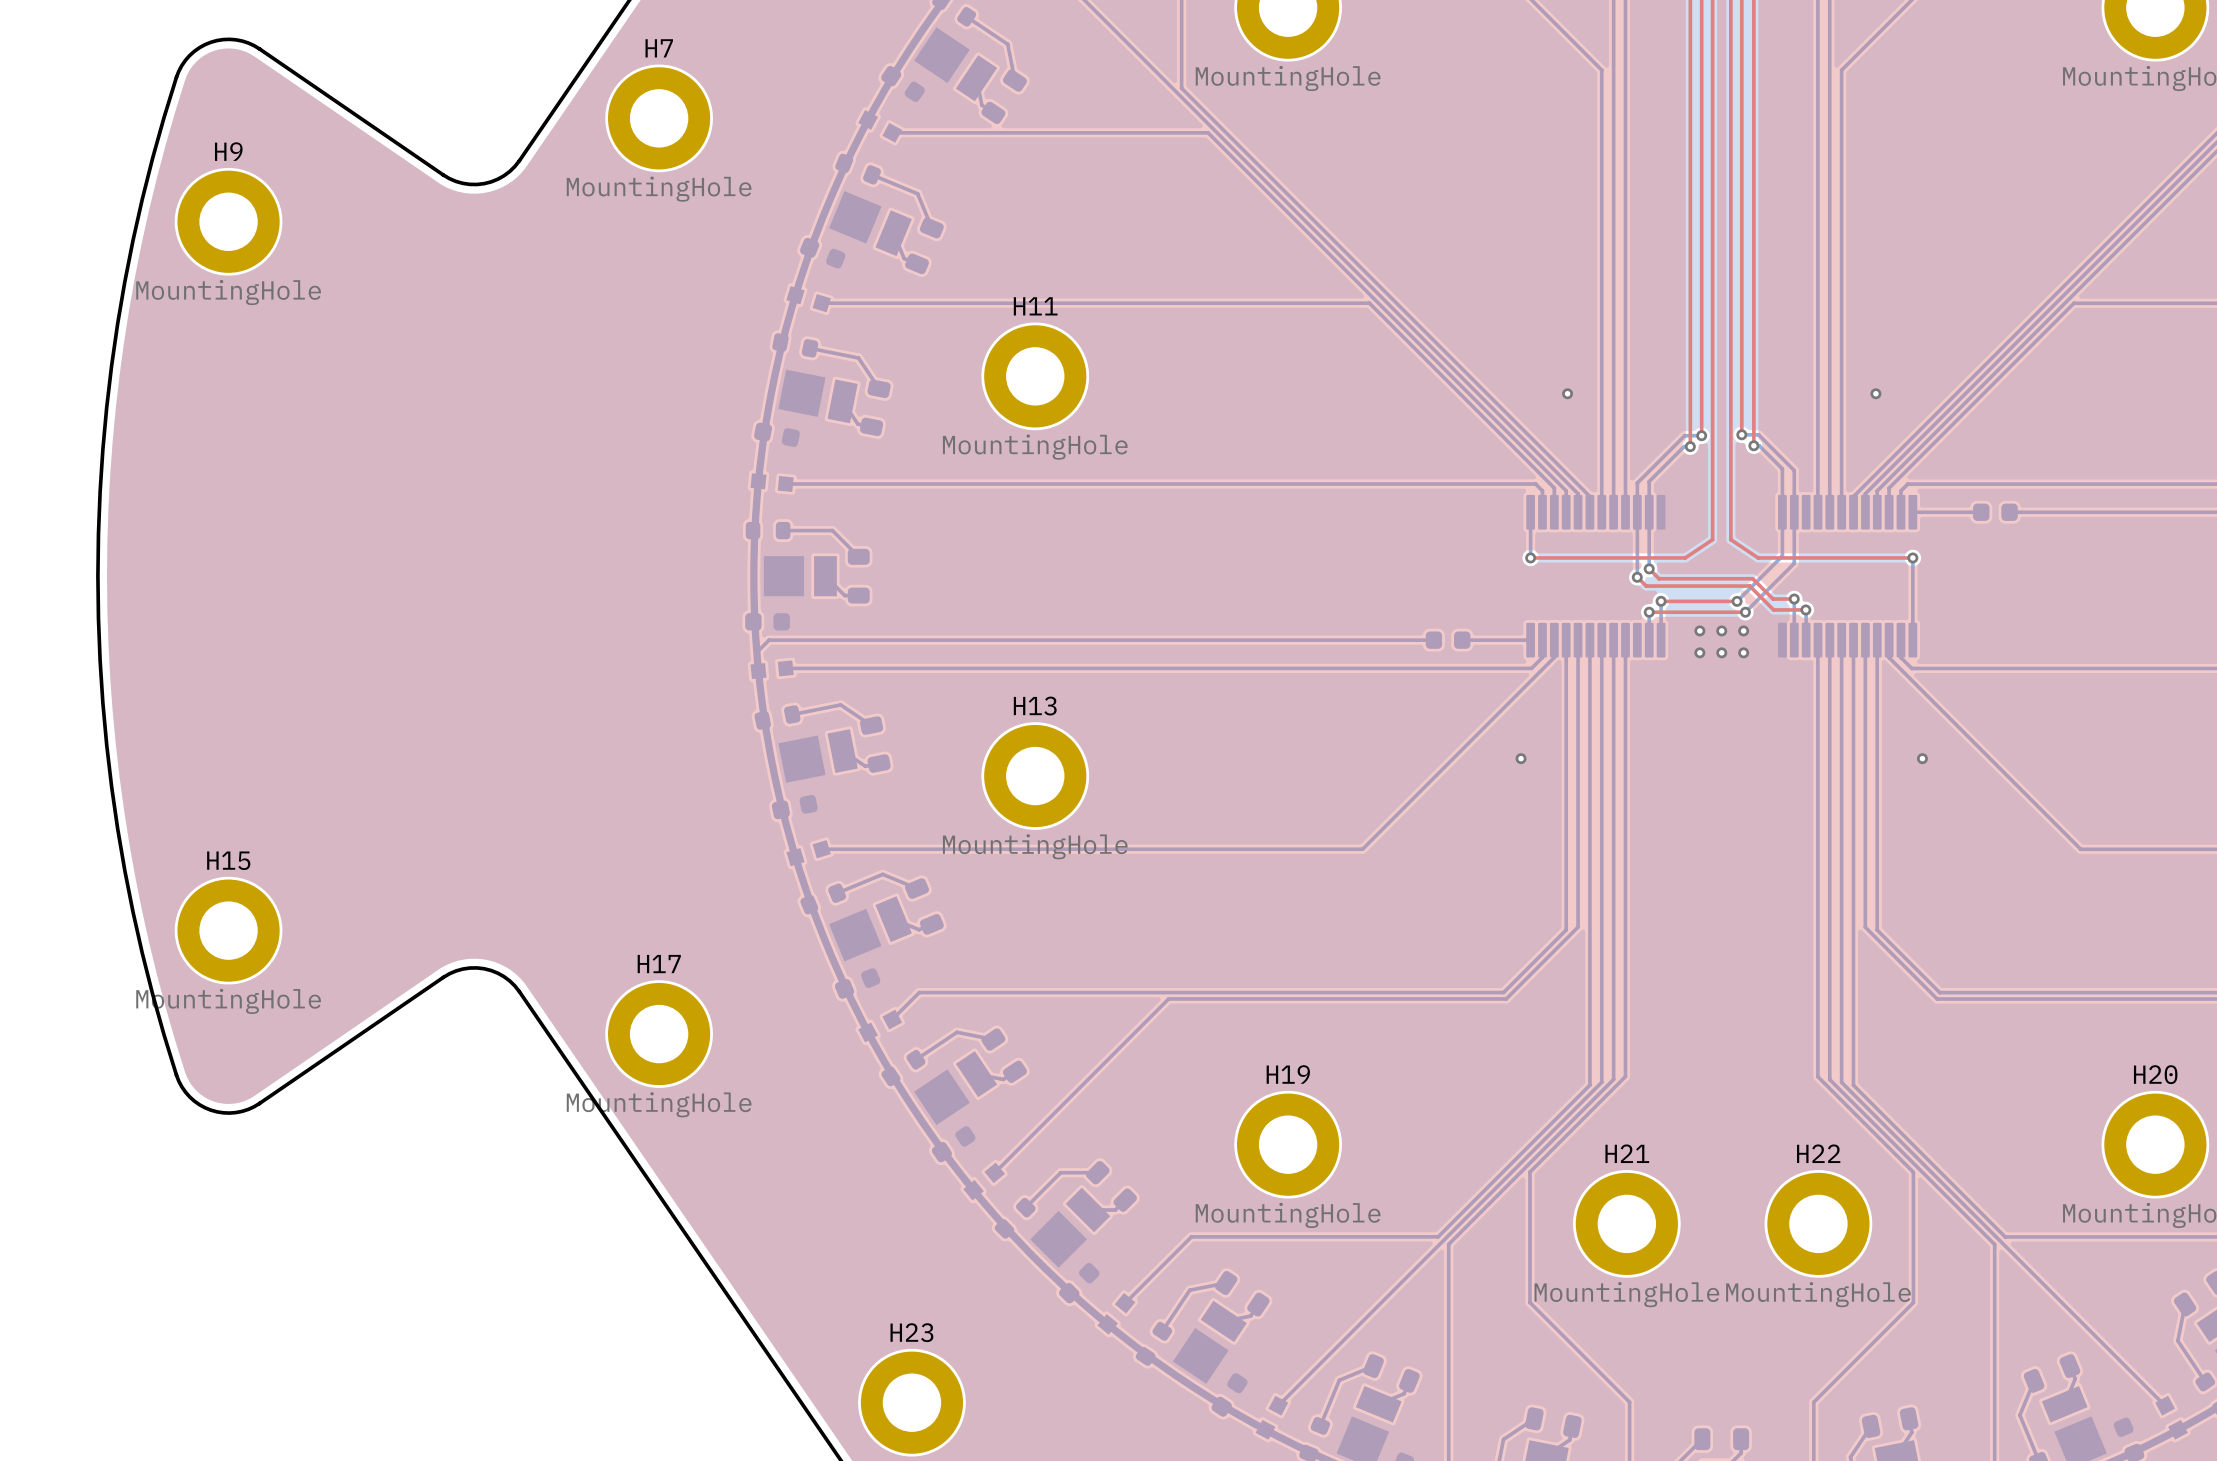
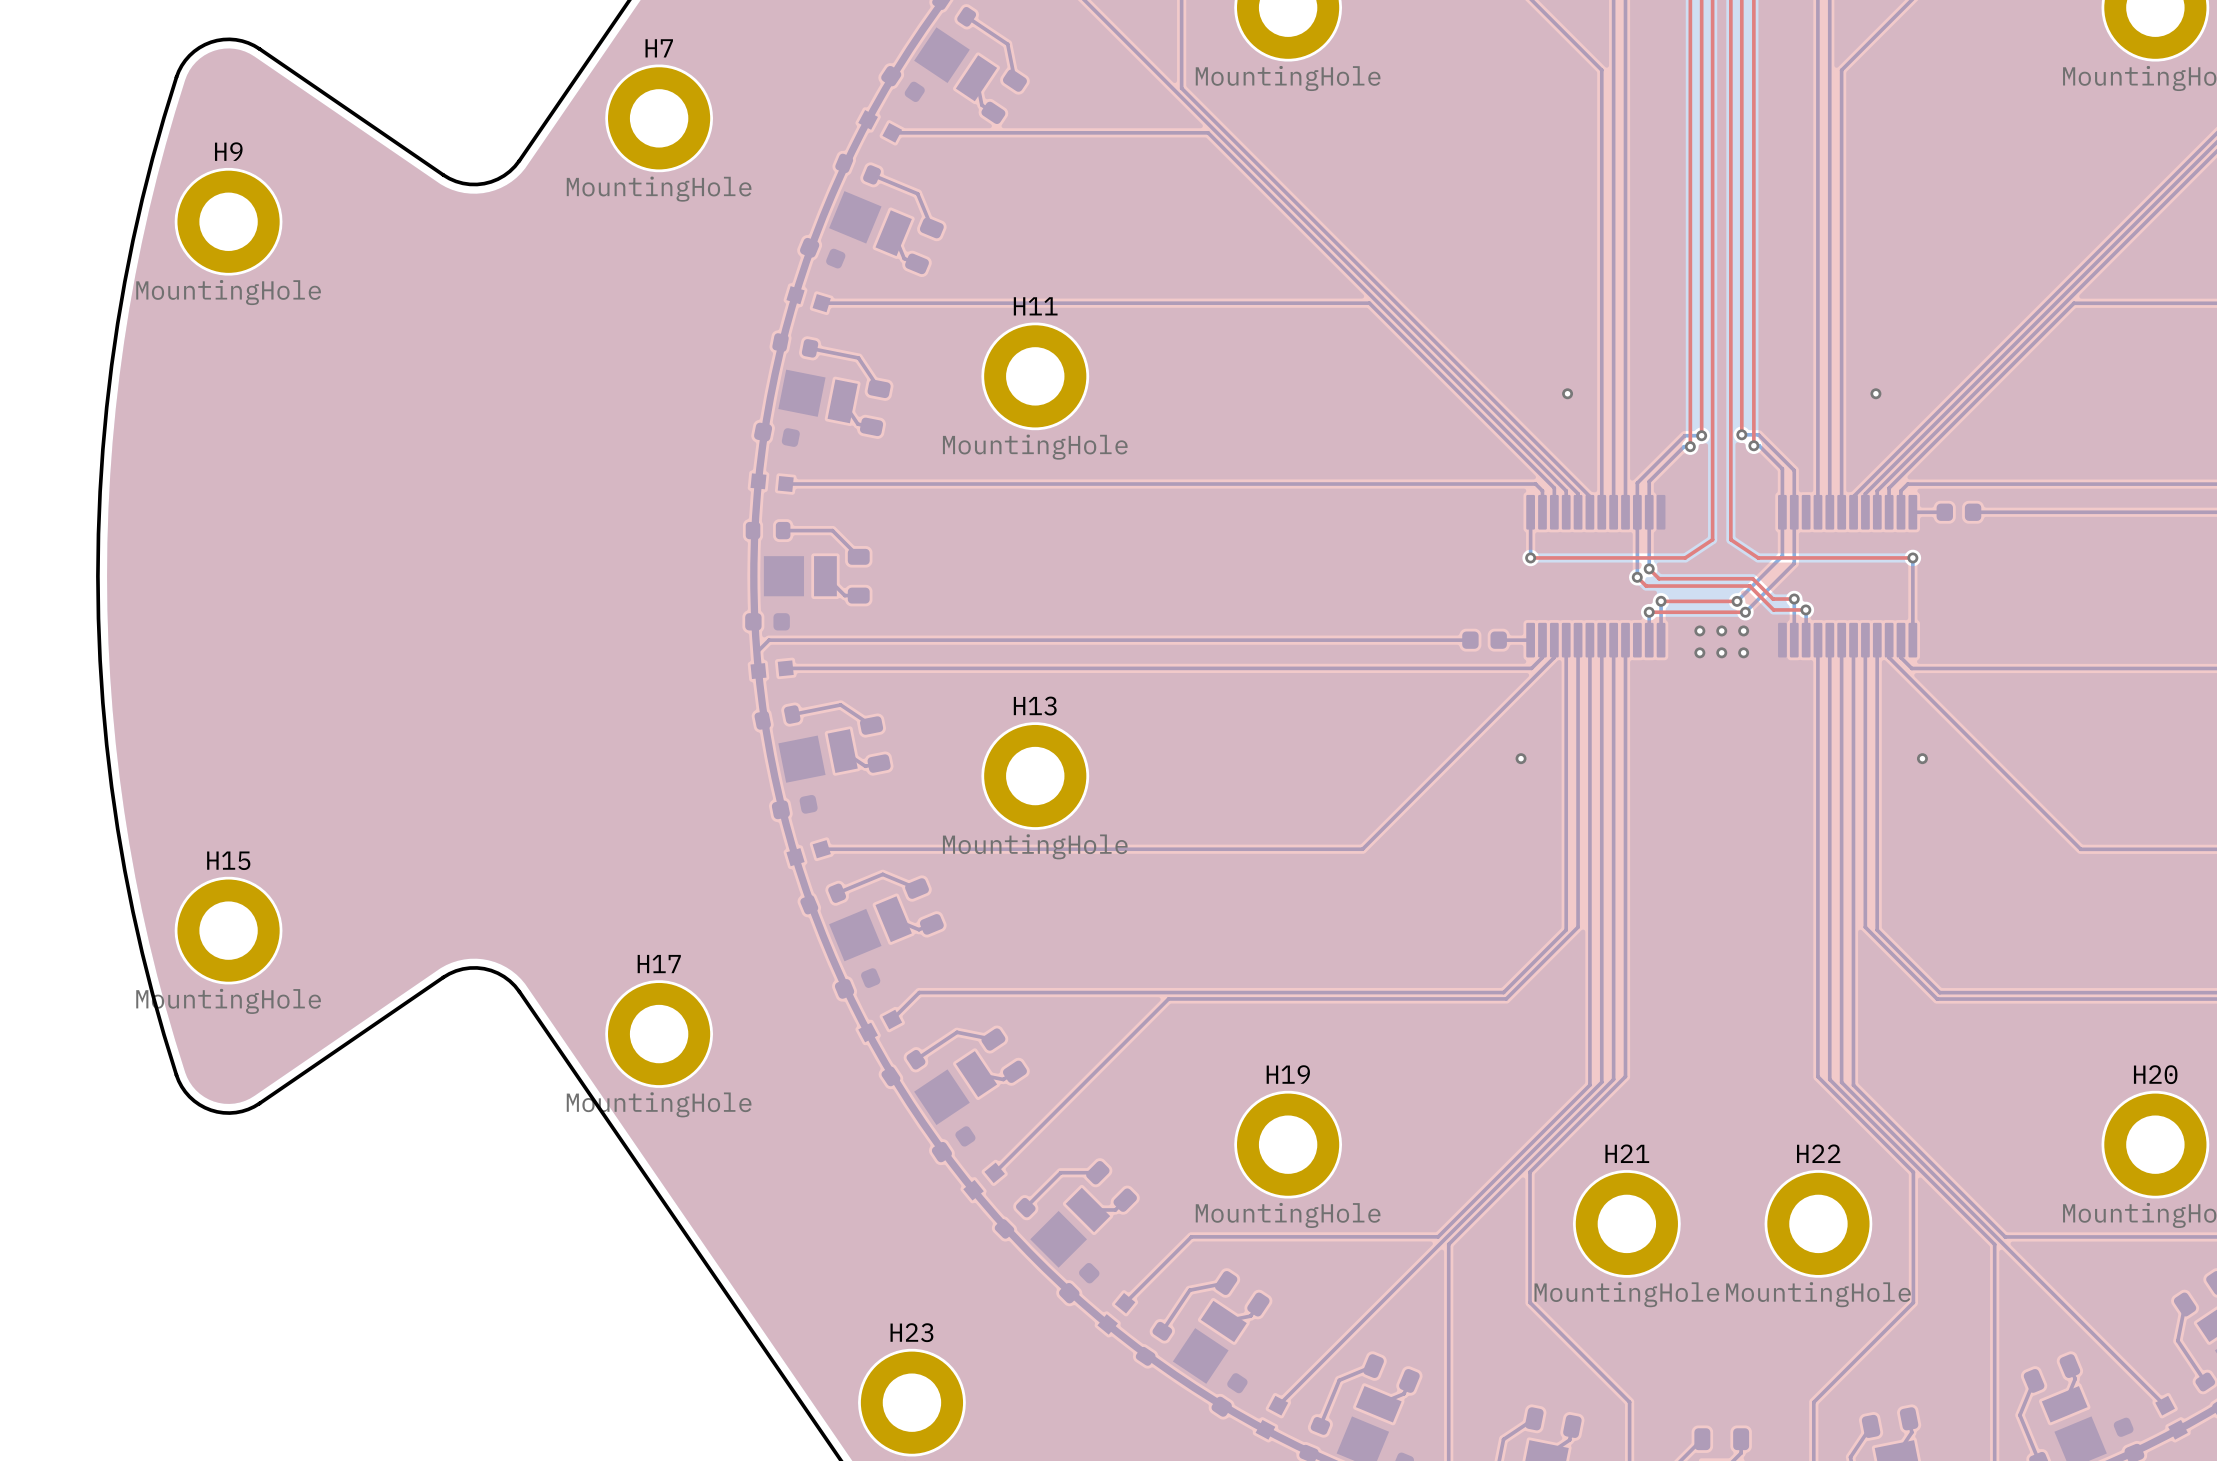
bottom track: (1944, 512) (1973, 512) -> (1981, 512) (2009, 512)
part position: (1995, 512) -> (1958, 512)
part position: (1448, 640) -> (1484, 640)
bottom track: (1470, 640) (1498, 640) -> (1433, 640) (1462, 640)

